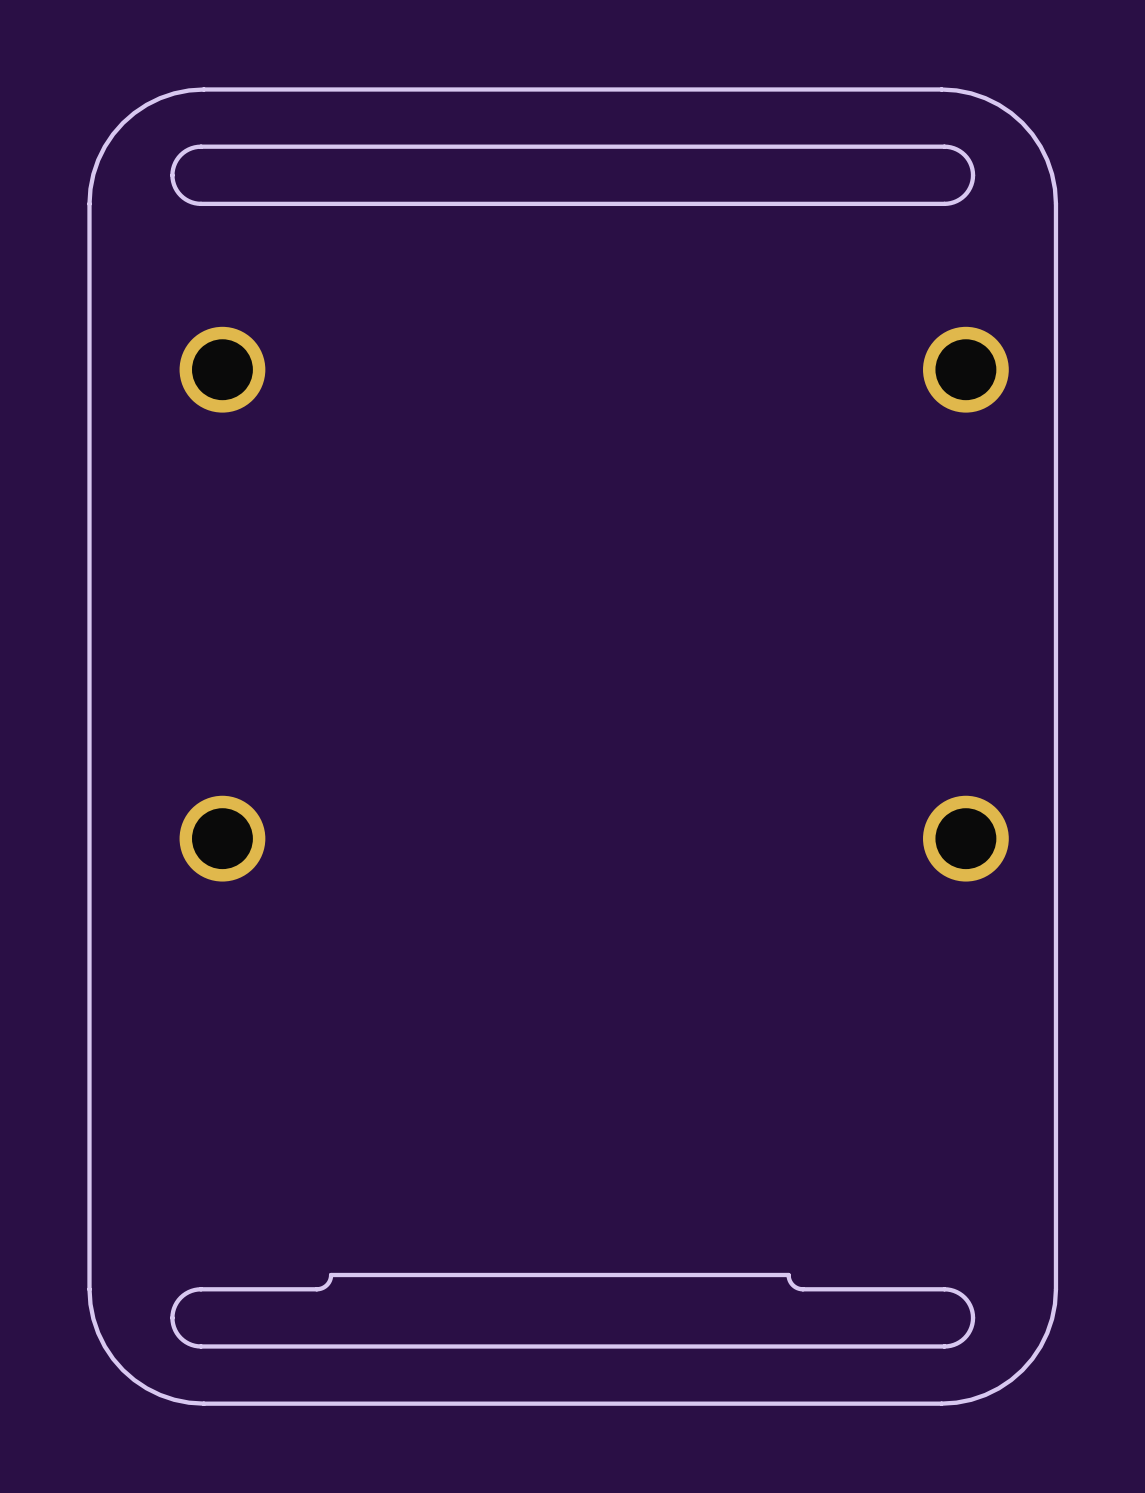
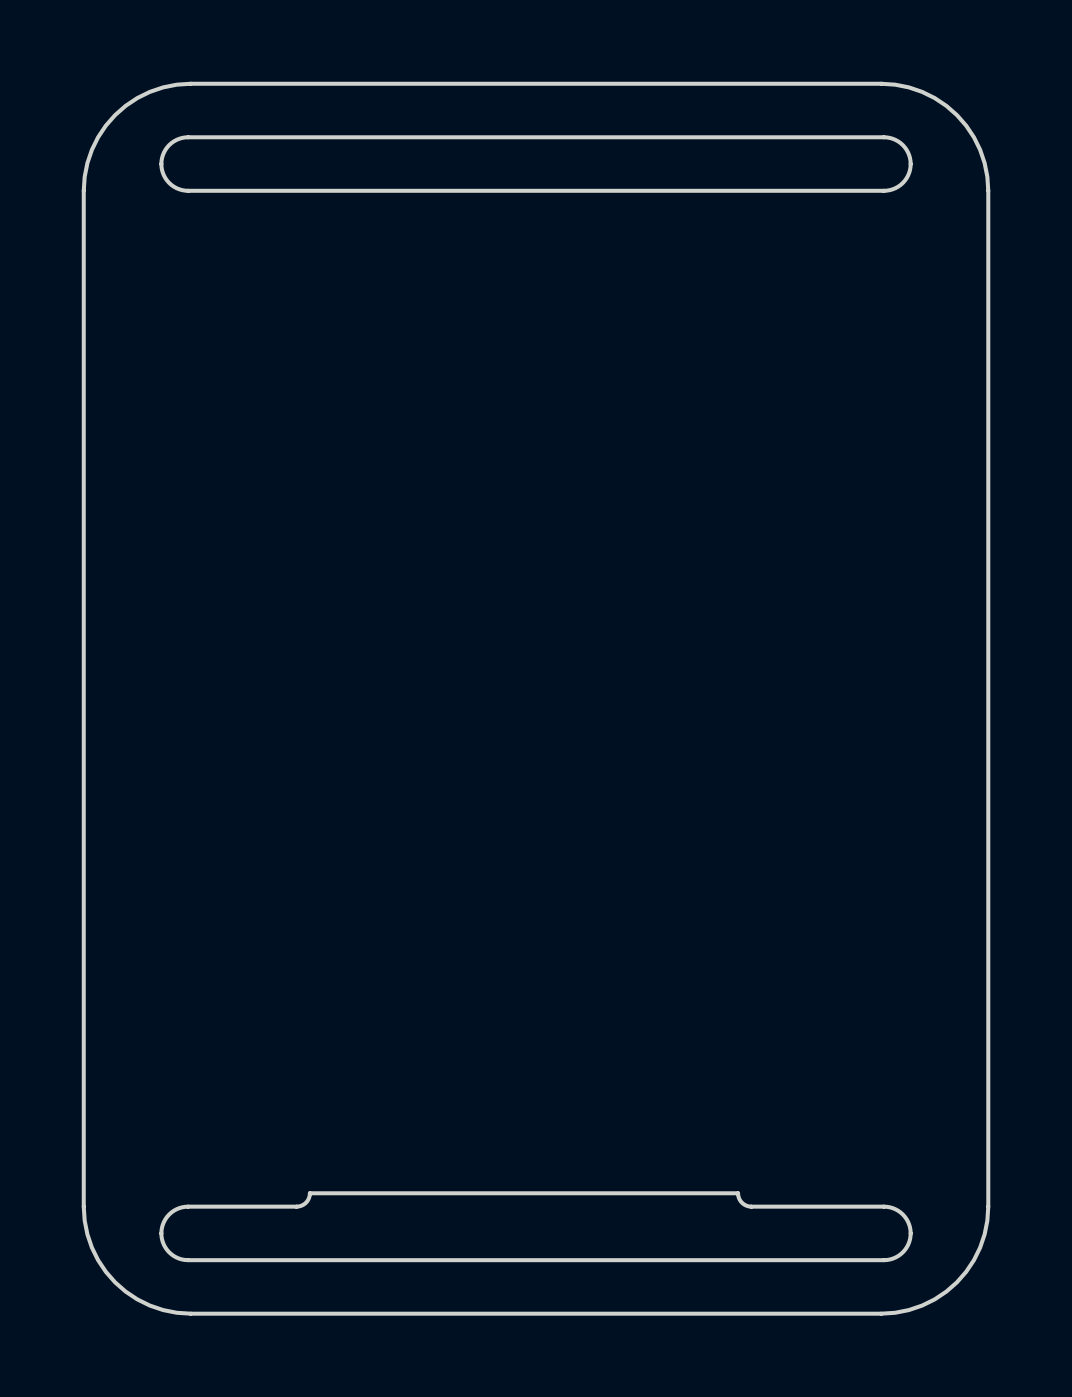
part: (222, 369) -> none
part: (965, 369) -> none
part: (222, 838) -> none
part: (965, 838) -> none

